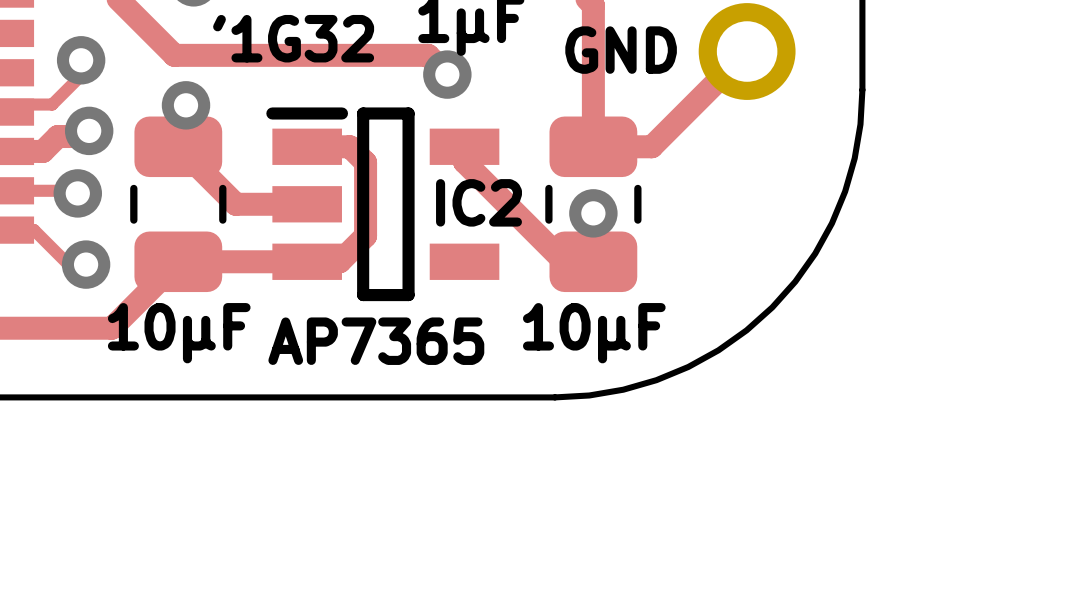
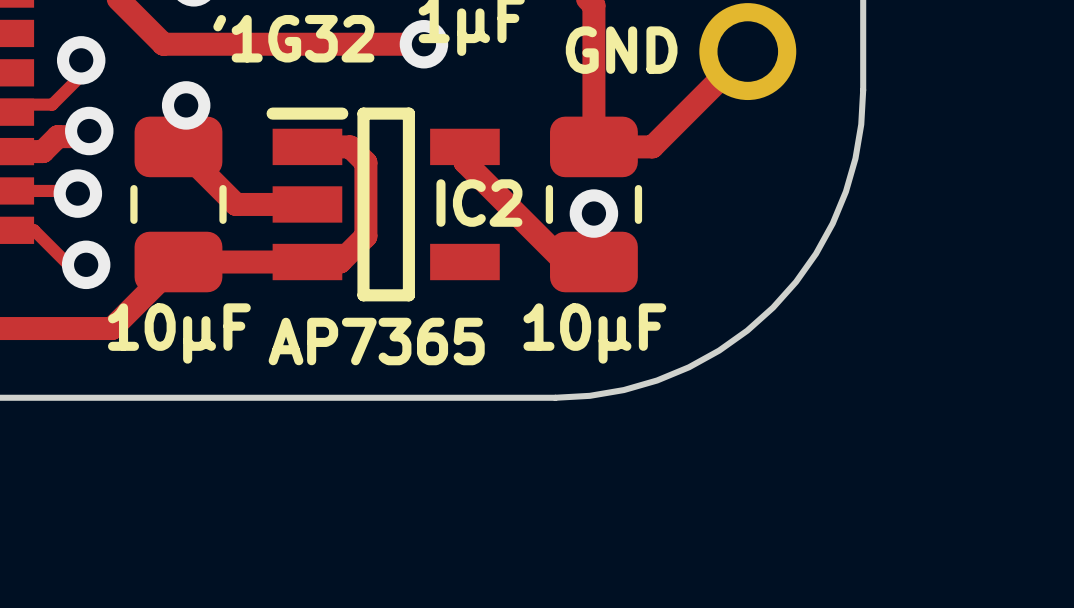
track: (163, 44) (174, 55) (428, 55) (447, 74) -> (163, 44) (423, 44)
via position: (447, 74) -> (423, 44)

